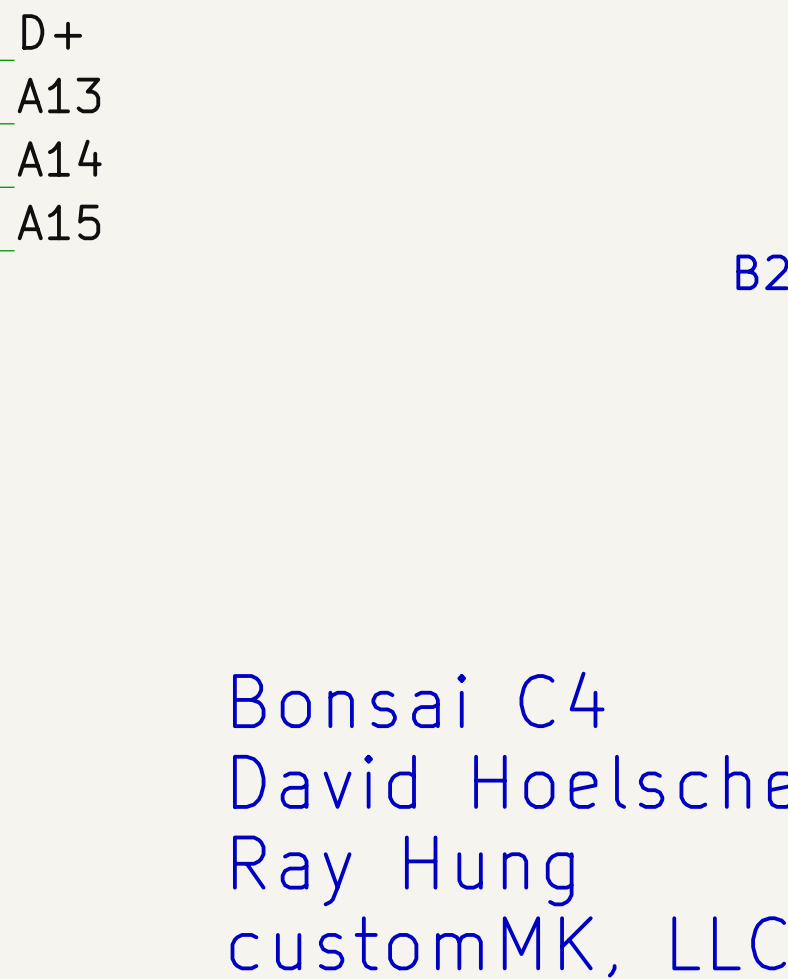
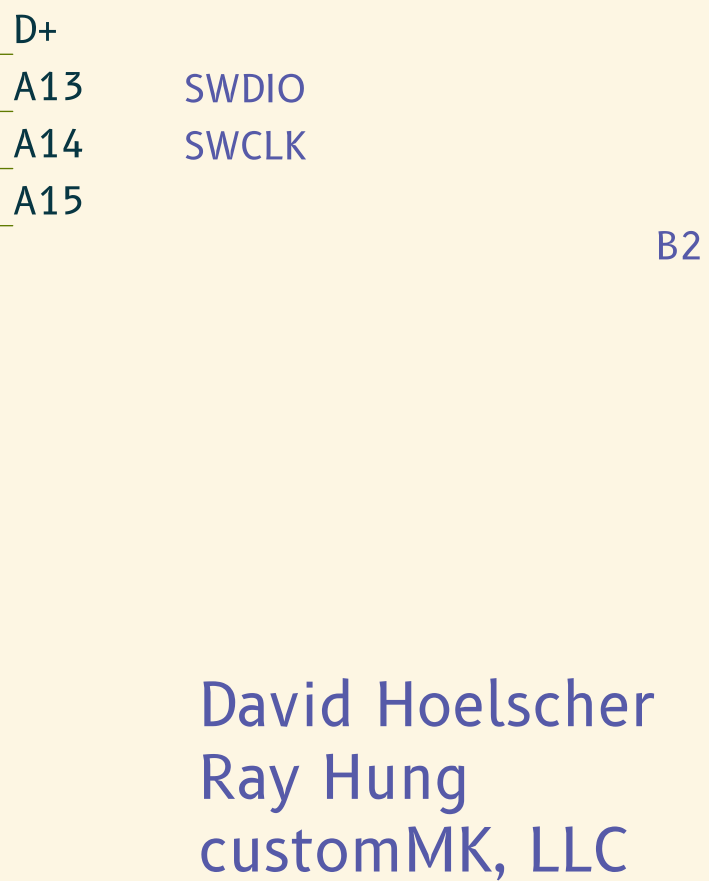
text: none -> SWDIO (244, 88)
text: none -> SWCLK (245, 145)
text: Bonsai C4 (418, 699) -> none

